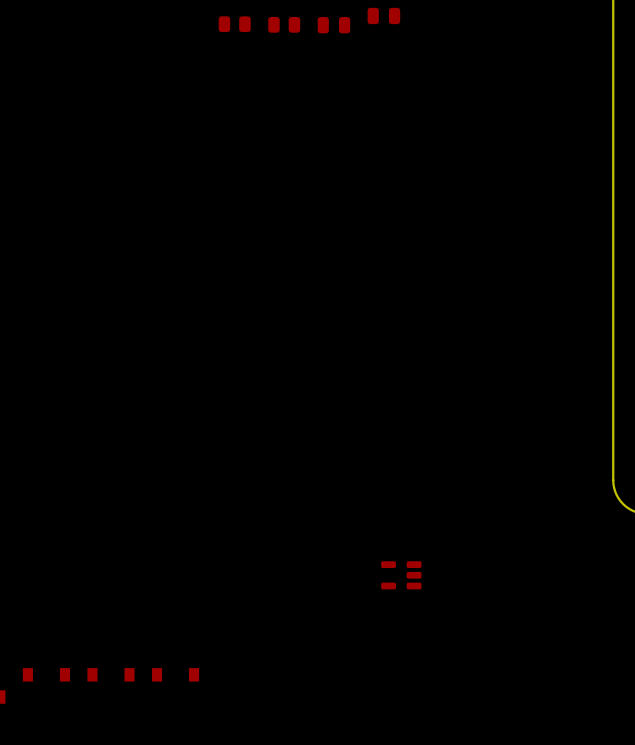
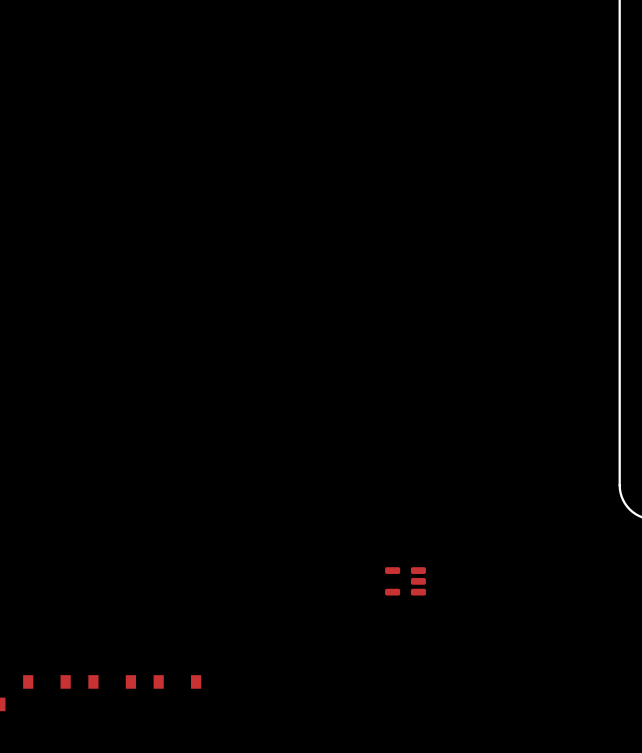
part: (383, 15) -> none
part: (234, 24) -> none
part: (284, 24) -> none
part: (333, 25) -> none

